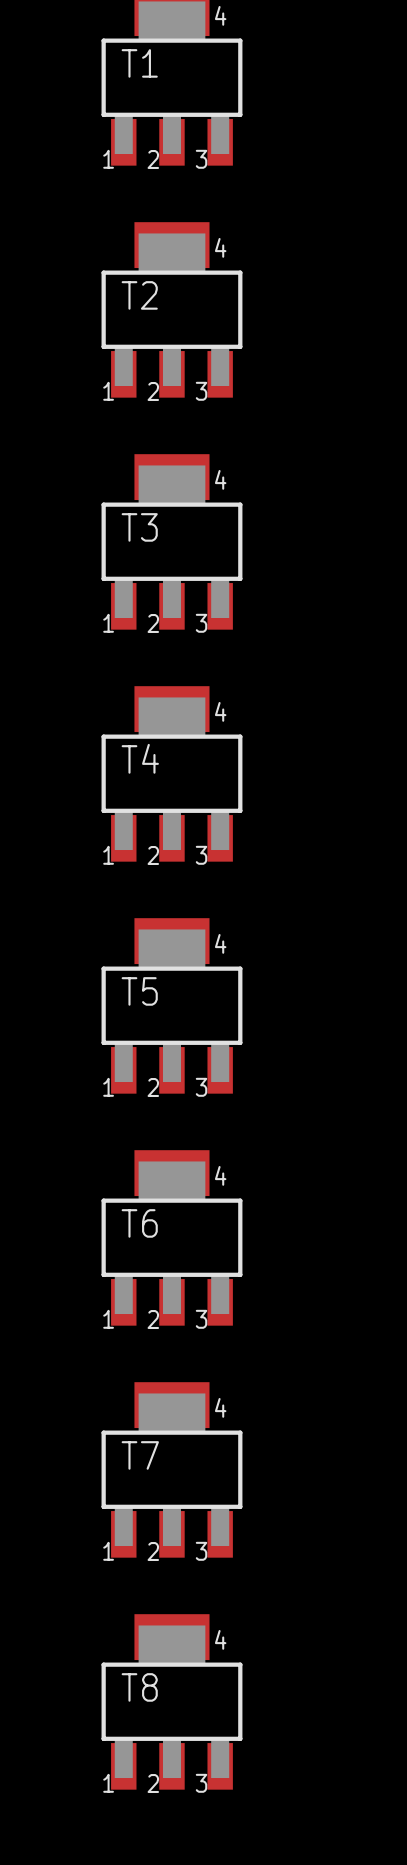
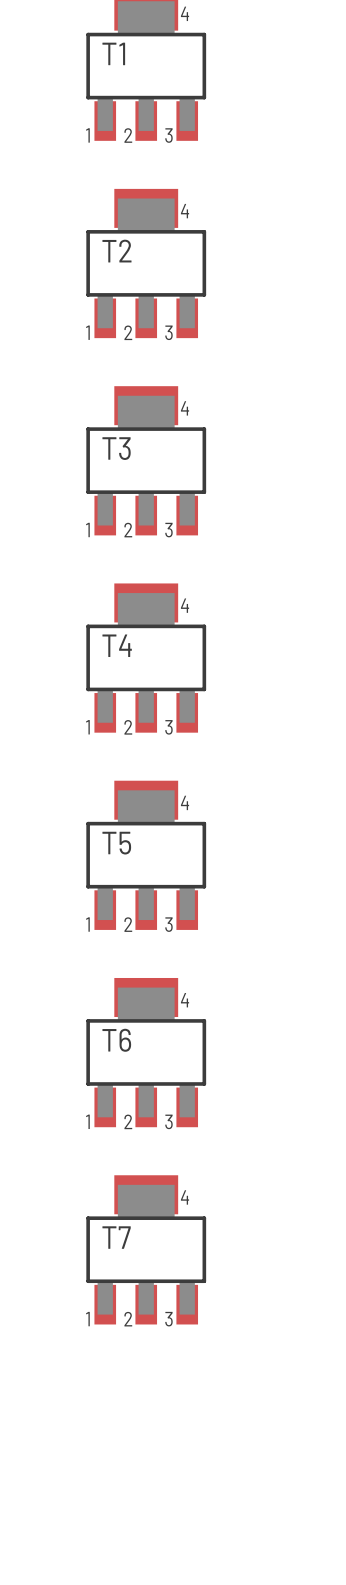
T8: (171, 1701) -> none

